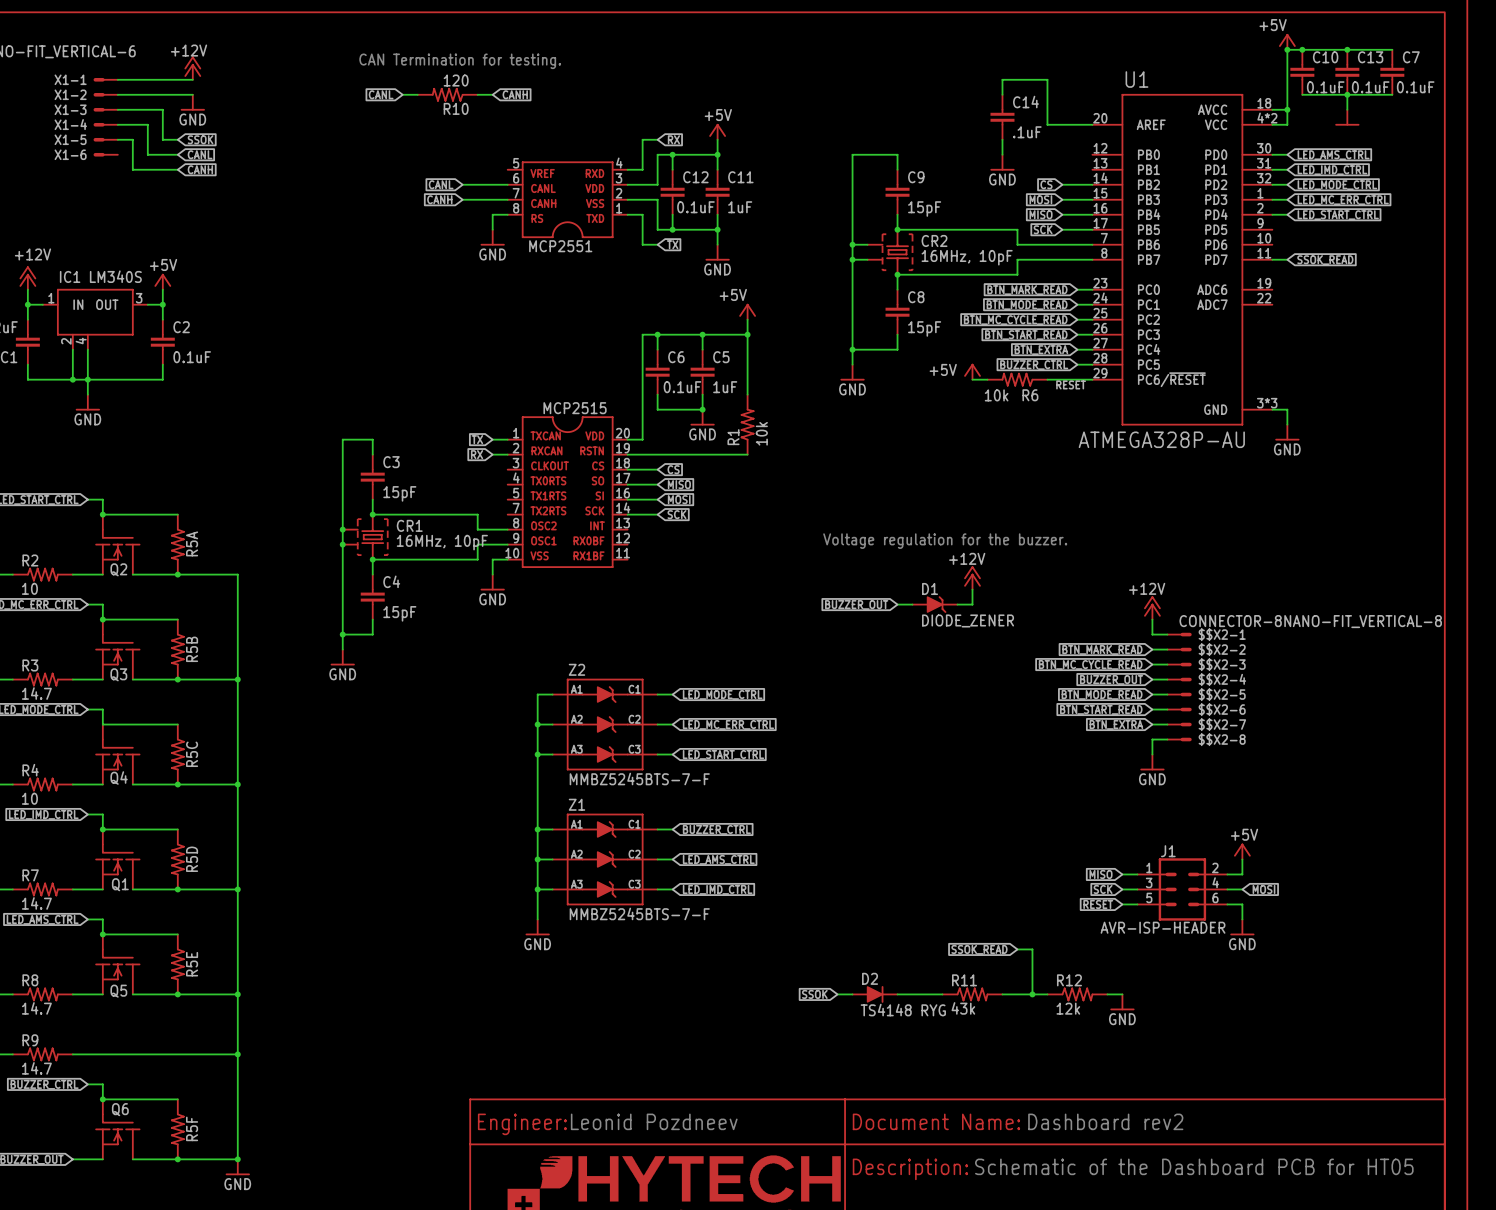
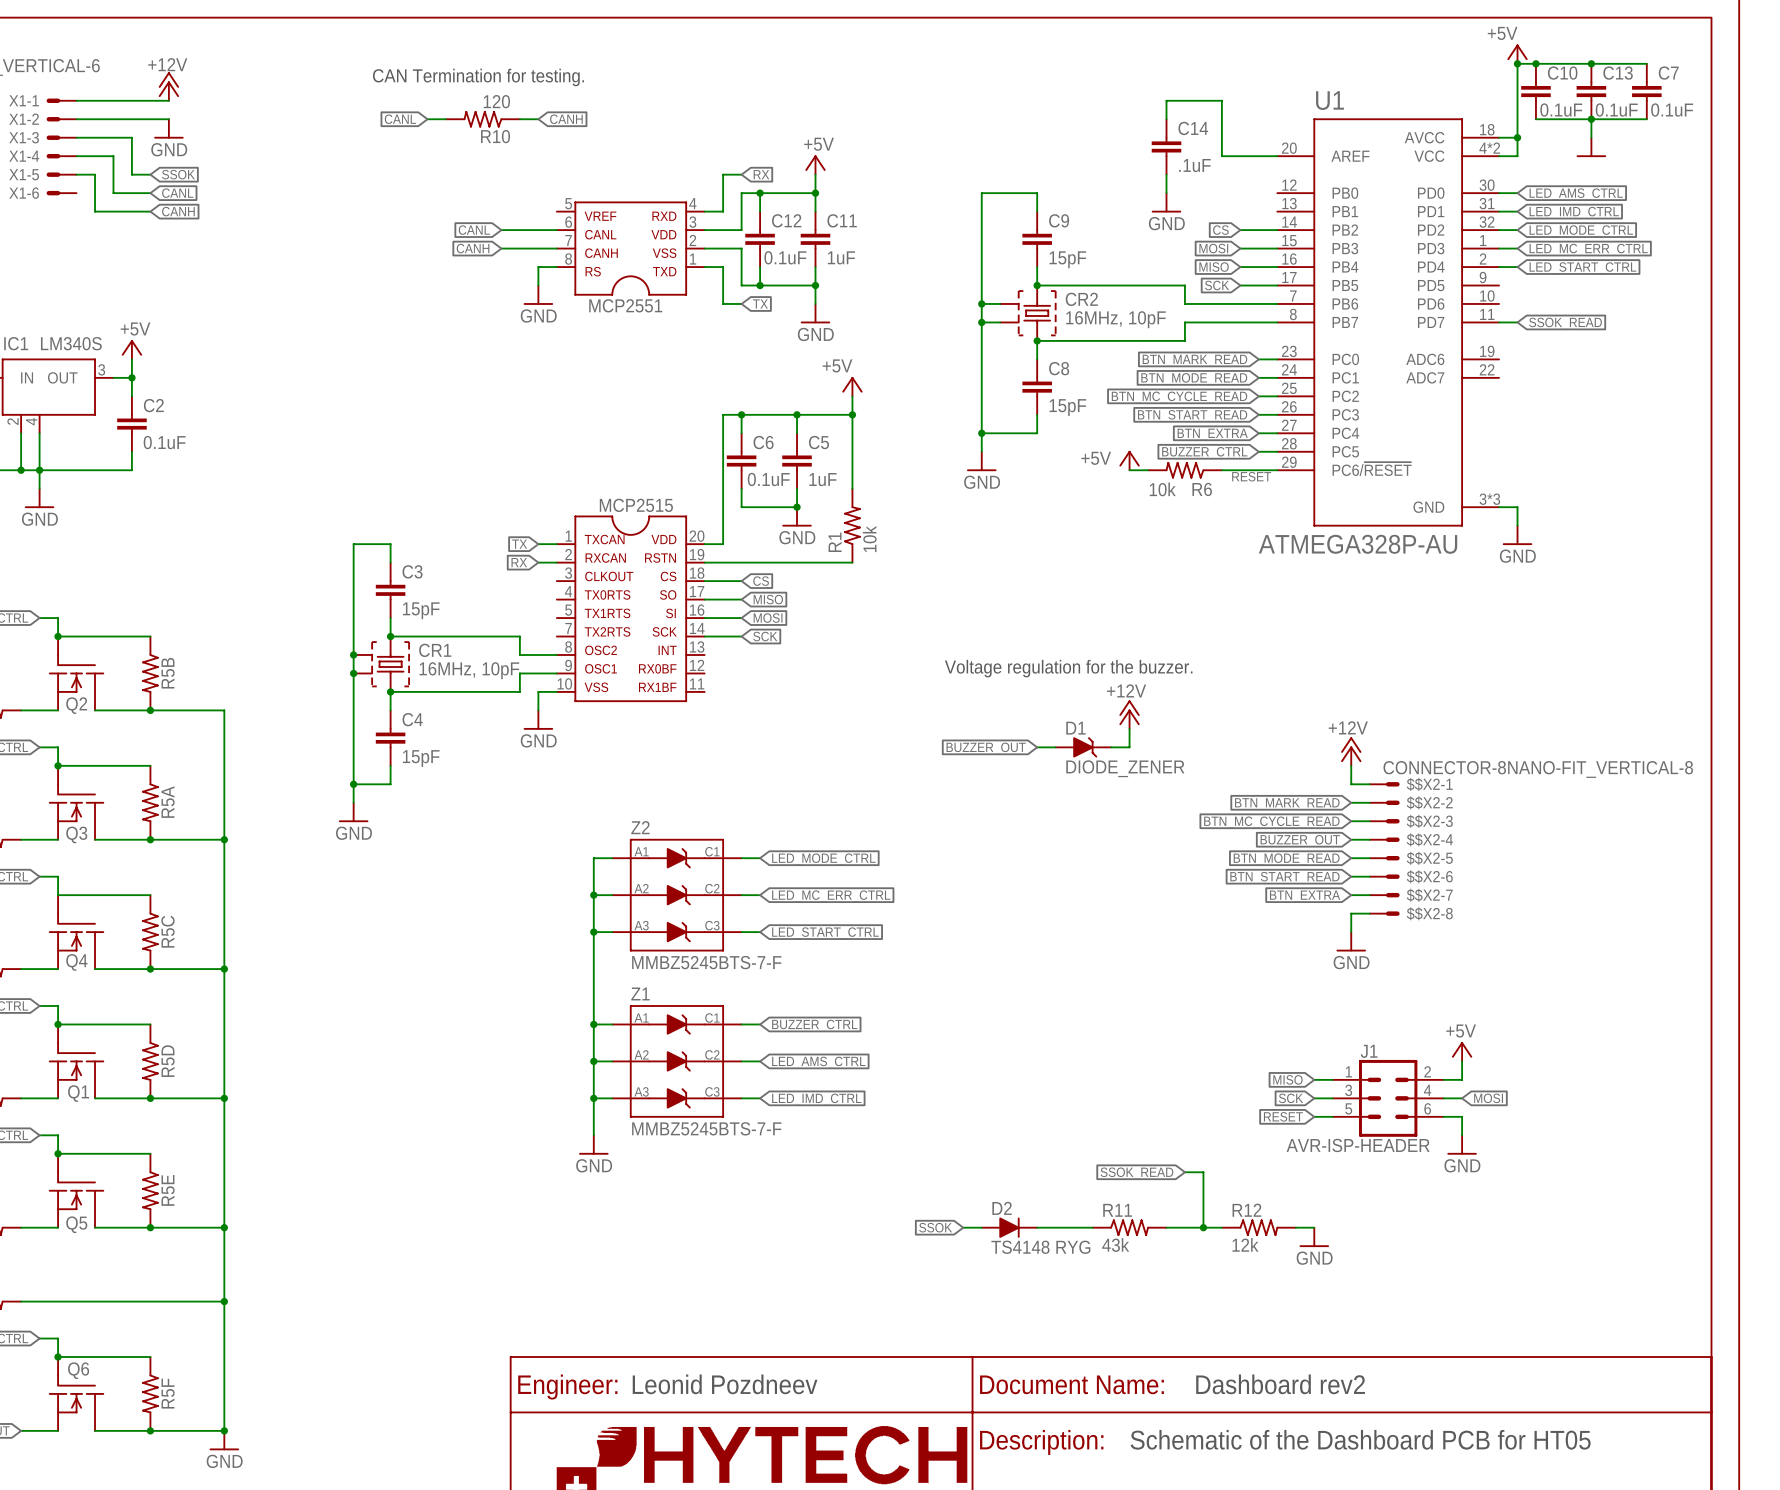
R5A name: R5A (192, 543) -> R5B (168, 673)
R5B name: R5B (192, 649) -> R5A (168, 802)

